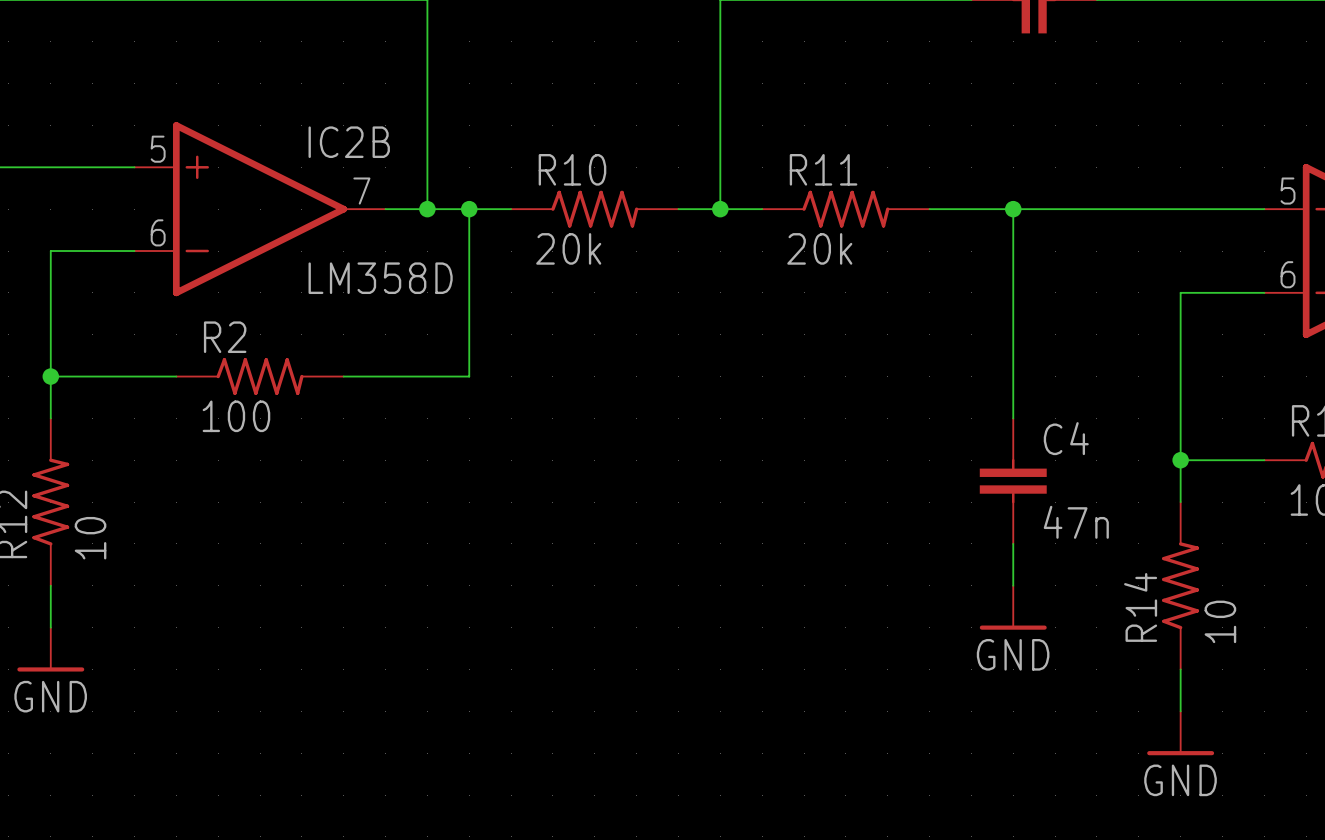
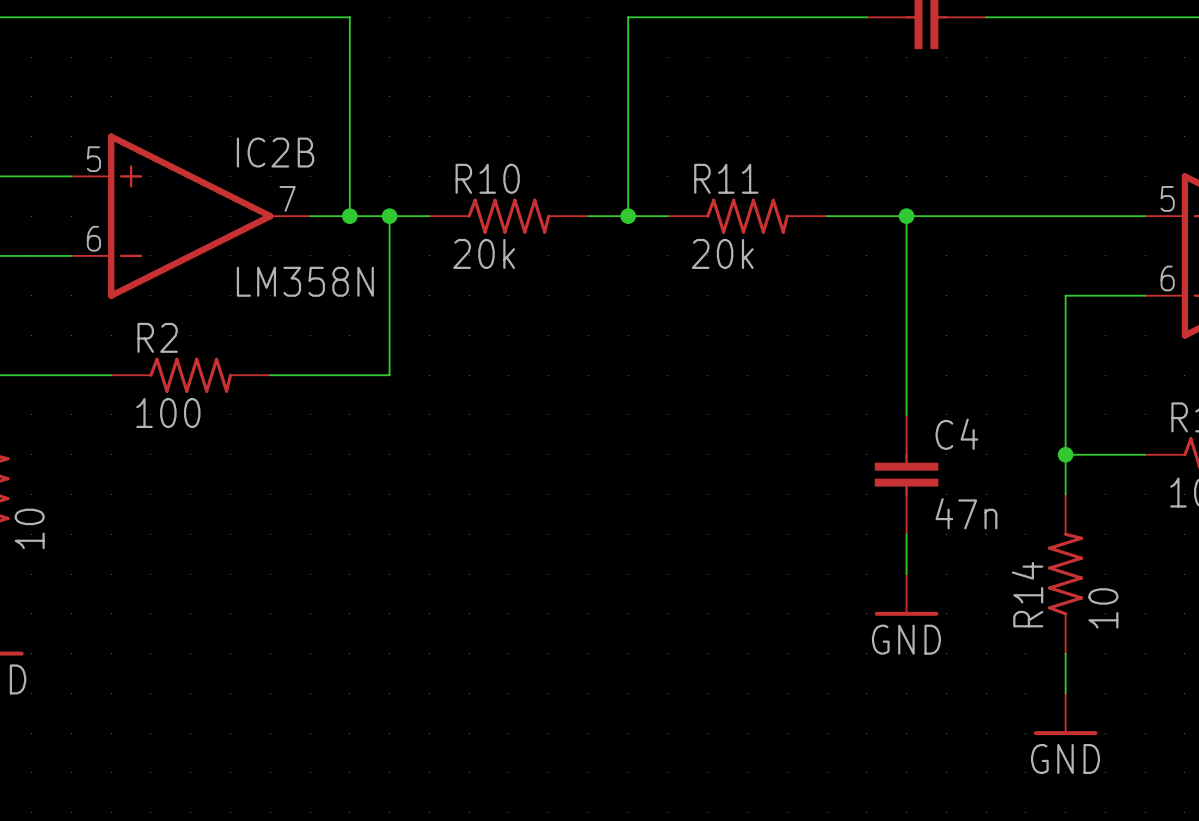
IC2B value: LM358D (380, 278) -> LM358N (305, 281)

